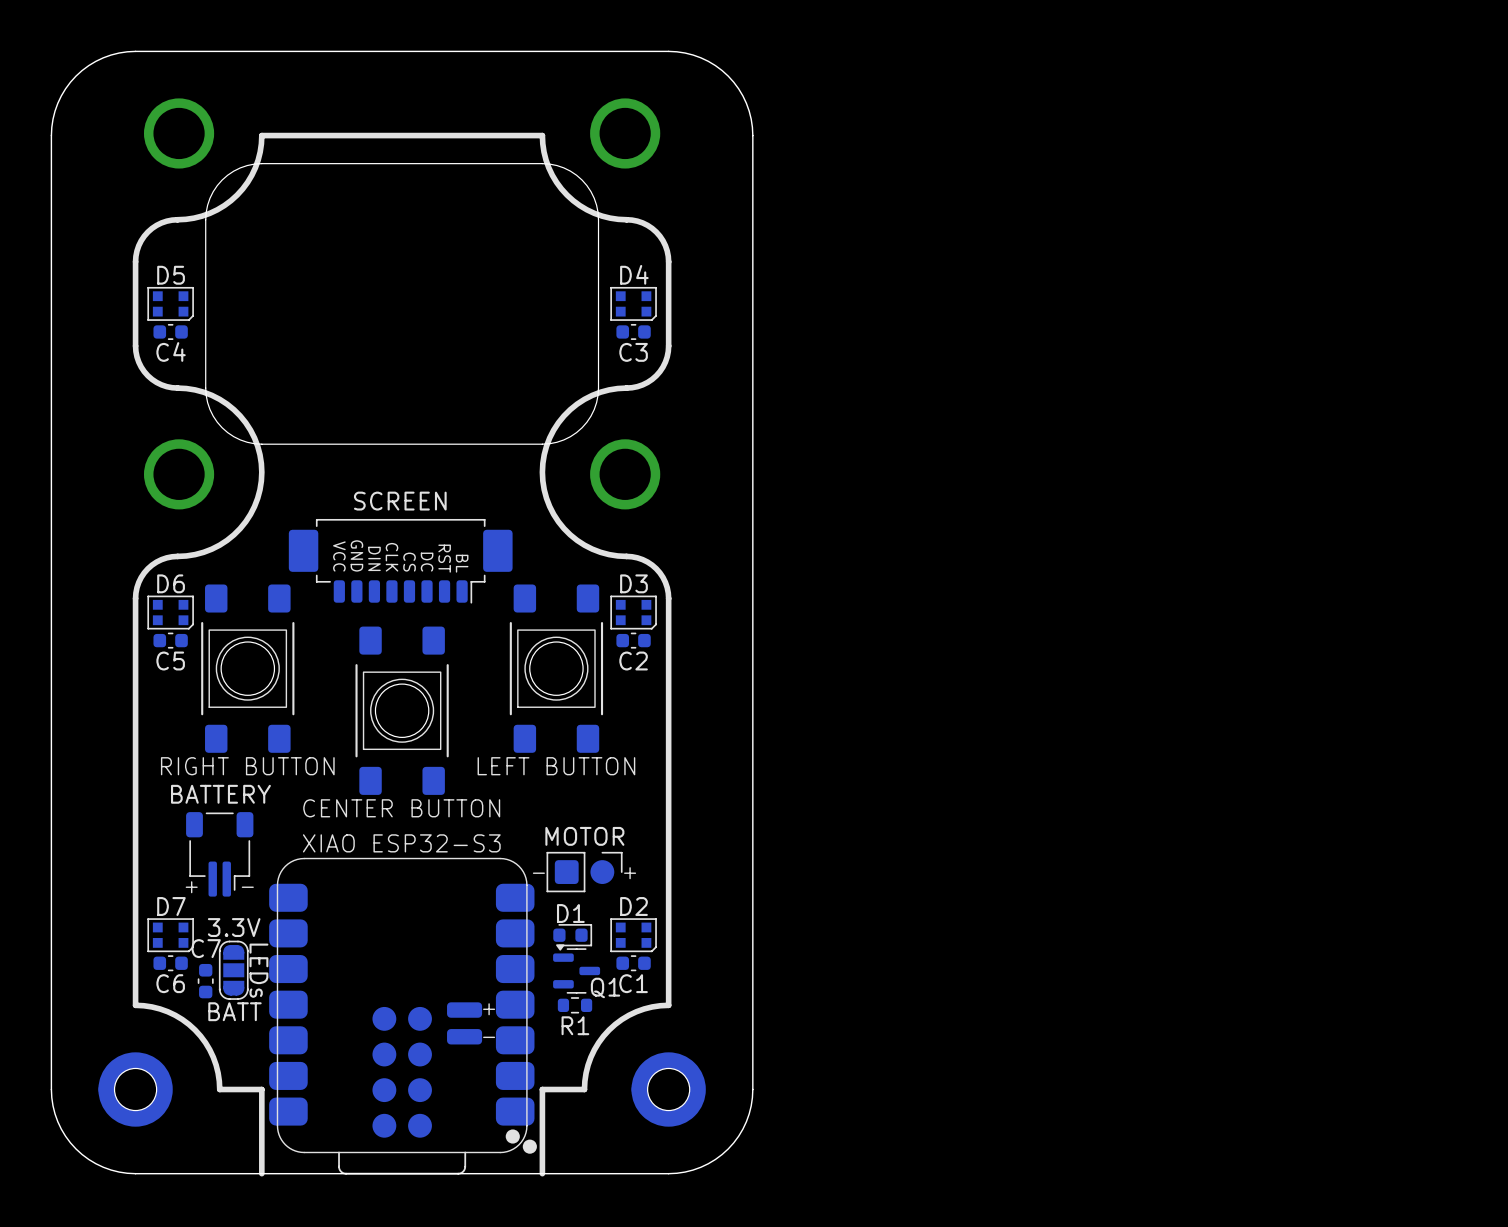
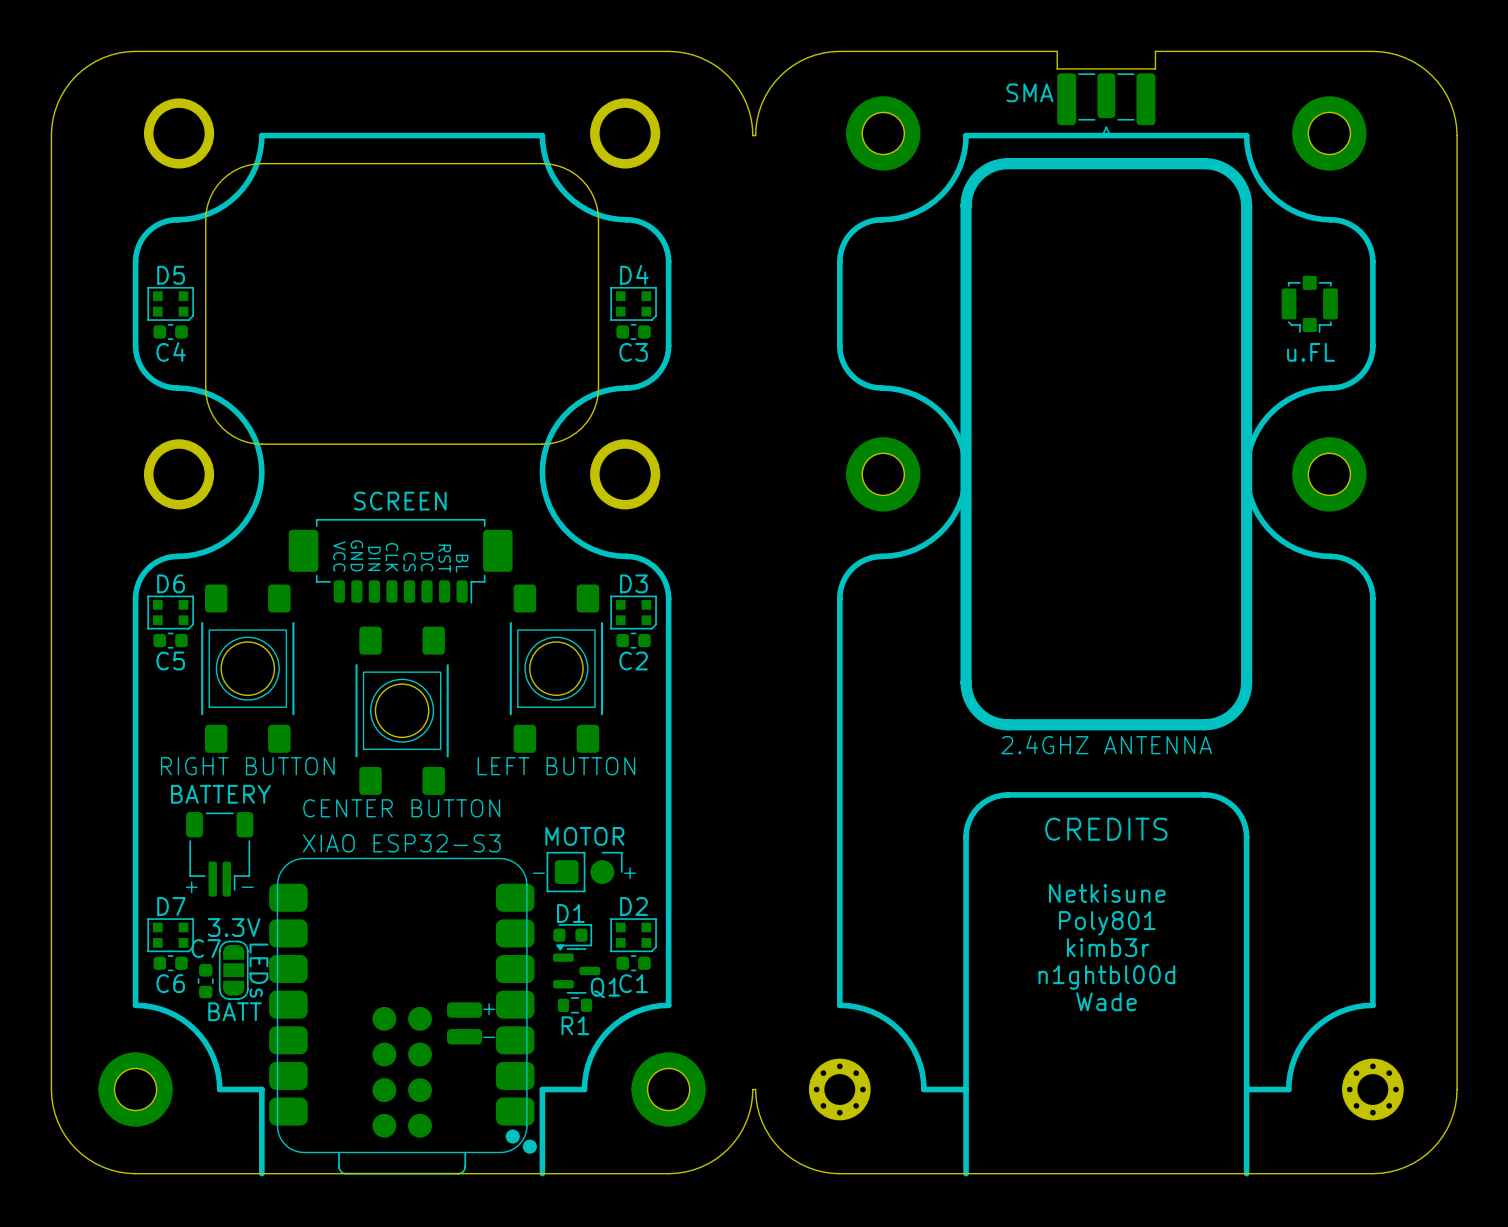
part: none -> SMA (1106, 104)
part: none -> (883, 133)
part: none -> (1329, 133)
board edge: (752, 135) (752, 1089) -> (752, 135) (755, 135) (757, 119) (762, 103) (769, 88) (780, 76) (793, 65) (807, 57) (823, 53) (839, 51) (1057, 51) (1057, 68) (1155, 68) (1155, 51) (1381, 51) (1397, 55) (1412, 61) (1426, 70) (1437, 82) (1450, 103) (1455, 119) (1457, 135) (1457, 1089) (1453, 1113) (1442, 1136) (1432, 1149) (1419, 1159) (1397, 1170) (1381, 1173) (831, 1173) (815, 1170) (800, 1163) (780, 1149) (769, 1136) (762, 1121) (757, 1105) (755, 1089) (752, 1089)
line: none -> (1204, 163) (1002, 163) (982, 172) (969, 189) (966, 205) (966, 682) (971, 703) (982, 716) (992, 721) (1008, 724) (1210, 724) (1230, 716) (1243, 698) (1246, 682) (1246, 200) (1240, 184) (1230, 172) (1215, 165) (1204, 163)
part: none -> u.FL (1309, 304)
part: none -> (883, 474)
part: none -> (1329, 474)
text: none -> 2.4GHZ ANTENNA (1106, 744)
text: none -> CREDITS (1106, 829)
text: none -> Netkisune (1107, 893)
text: none -> Poly801 (1107, 923)
text: none -> kimb3r (1108, 947)
text: none -> n1ghtbl00d (1106, 977)
text: none -> Wade (1106, 1001)
part: none -> (839, 1089)
line: none -> (1246, 1089) (1288, 1089) (1290, 1073) (1295, 1057) (1302, 1042) (1313, 1029) (1326, 1019) (1340, 1011) (1356, 1006) (1372, 1005) (1371, 587) (1364, 572) (1351, 562) (1341, 557) (1304, 552) (1288, 545) (1274, 534) (1262, 521) (1253, 506) (1248, 489) (1246, 472) (1248, 454) (1253, 438) (1262, 422) (1274, 409) (1288, 399) (1304, 392) (1346, 384) (1360, 375) (1367, 367) (1372, 346) (1372, 256) (1367, 240) (1351, 225) (1341, 221) (1314, 218) (1298, 213) (1284, 205) (1271, 195) (1260, 182) (1253, 167) (1248, 151) (1246, 135) (966, 135) (964, 151) (959, 167) (951, 182) (941, 195) (928, 205) (914, 213) (898, 218) (870, 221) (860, 225) (848, 236) (841, 250) (839, 346) (845, 367) (852, 375) (865, 384) (907, 392) (923, 399) (938, 409) (949, 422) (958, 438) (964, 454) (966, 472) (964, 489) (958, 506) (949, 521) (938, 534) (923, 545) (907, 552) (870, 557) (860, 562) (848, 572) (841, 587) (839, 1005) (856, 1006) (872, 1011) (886, 1019) (899, 1029) (909, 1042) (917, 1057) (922, 1073) (923, 1089) (966, 1089)
part: none -> (1372, 1089)
line: none -> (1246, 1173) (1246, 831) (1240, 815) (1230, 803) (1215, 796) (1204, 794) (1002, 795) (982, 803) (971, 815) (966, 836) (966, 1173)

